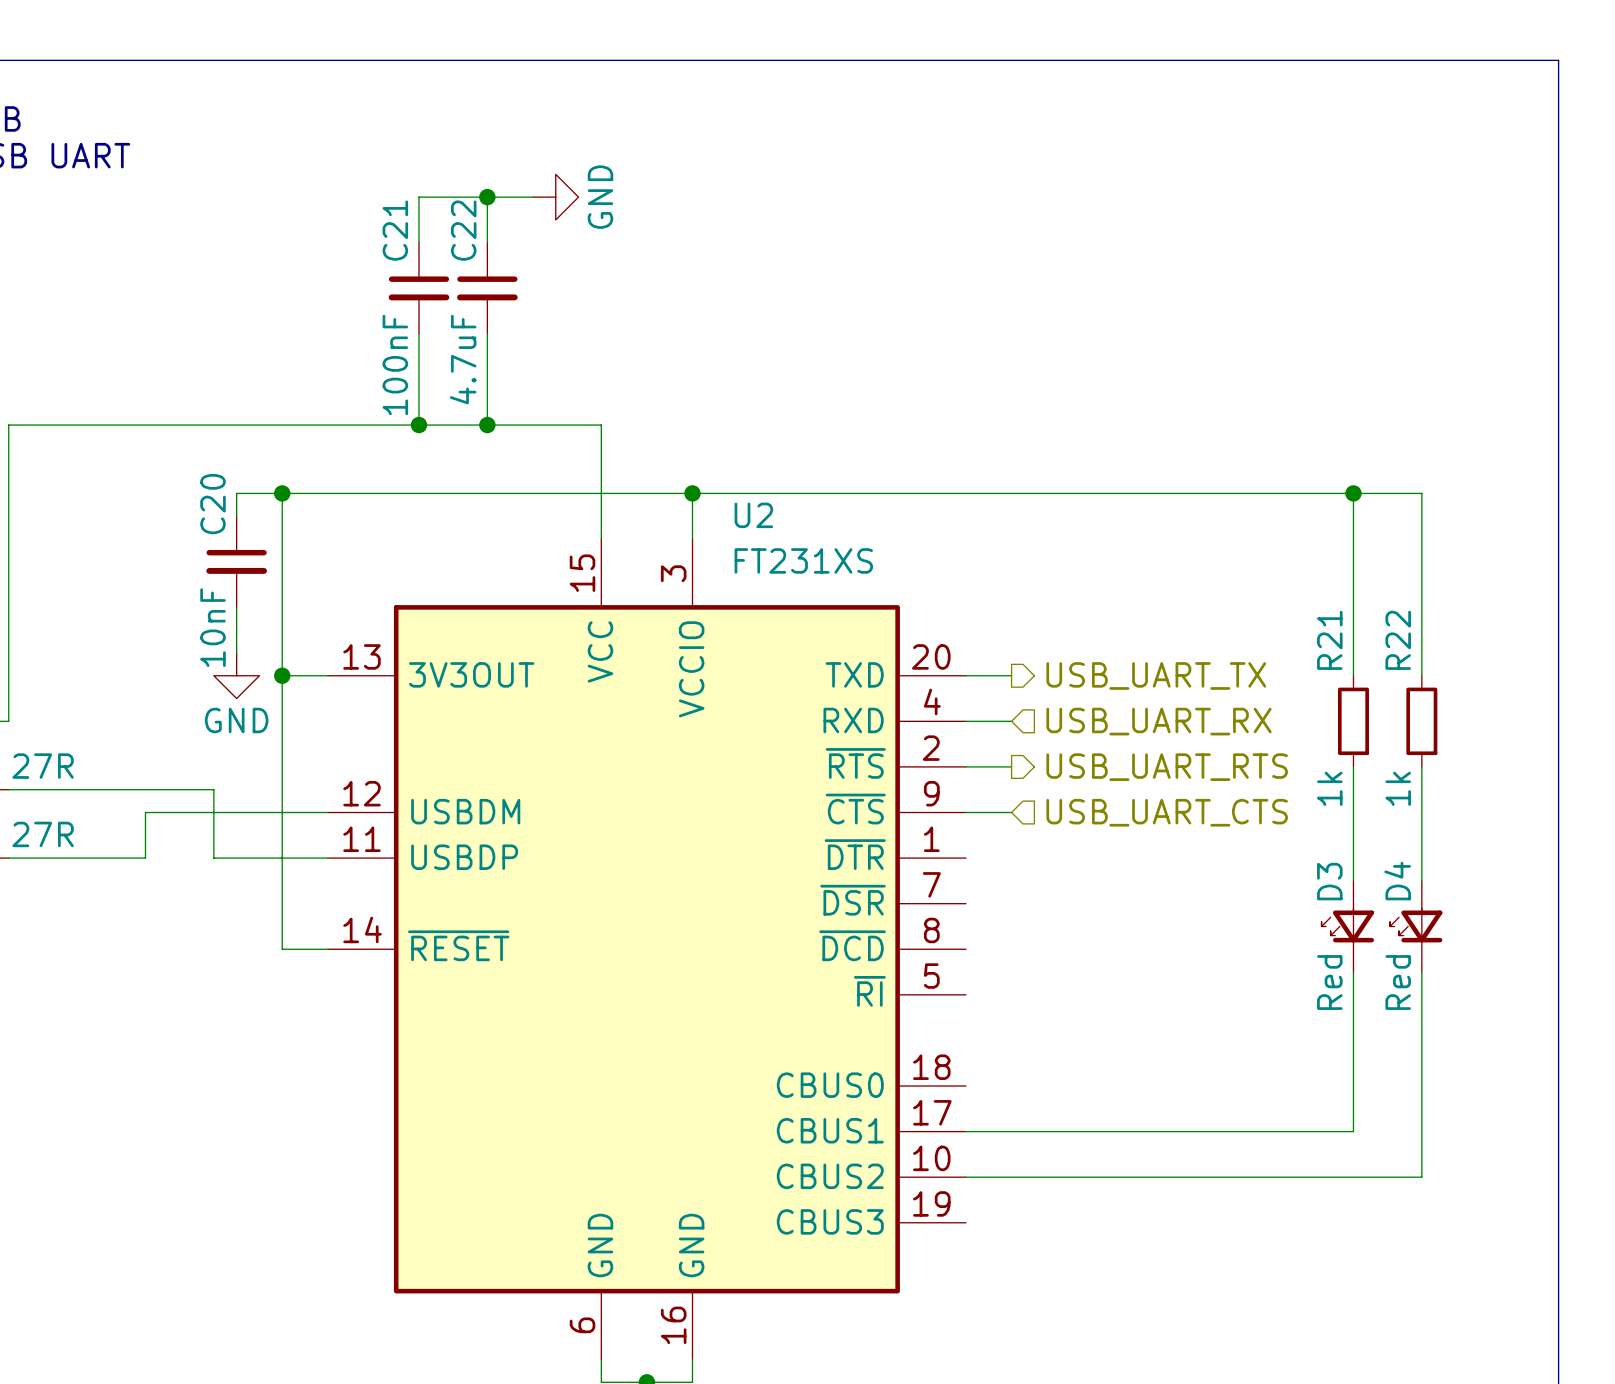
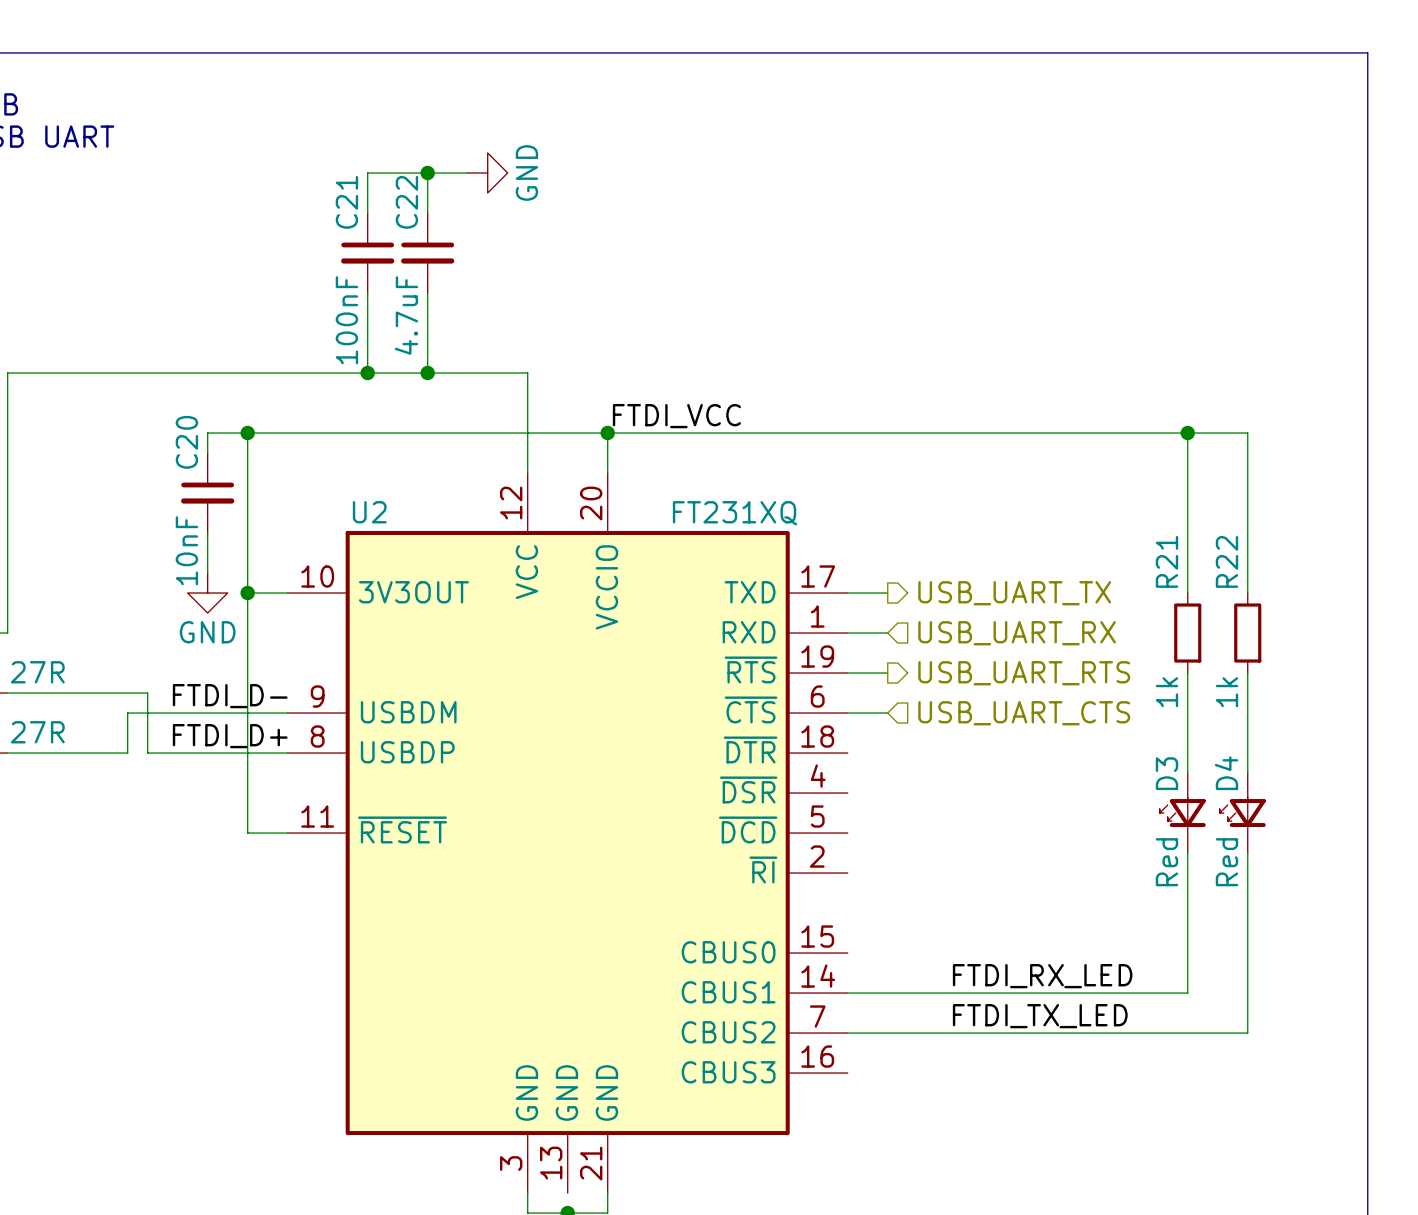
label: none -> FTDI_VCC (676, 416)
U2 name position: U2 (753, 515) -> U2 (369, 512)
U2 symbol: [327, 539, 967, 1360] -> [287, 473, 848, 1194]
U2 value: FT231XS (803, 560) -> FT231XQ (735, 513)
wire: (168, 789) (213, 789) (213, 858) -> (147, 693) (147, 753) (187, 753)
label: none -> FTDI_D- (230, 696)
label: none -> FTDI_D+ (230, 736)
label: none -> FTDI_RX_LED (1042, 976)
label: none -> FTDI_TX_LED (1040, 1016)

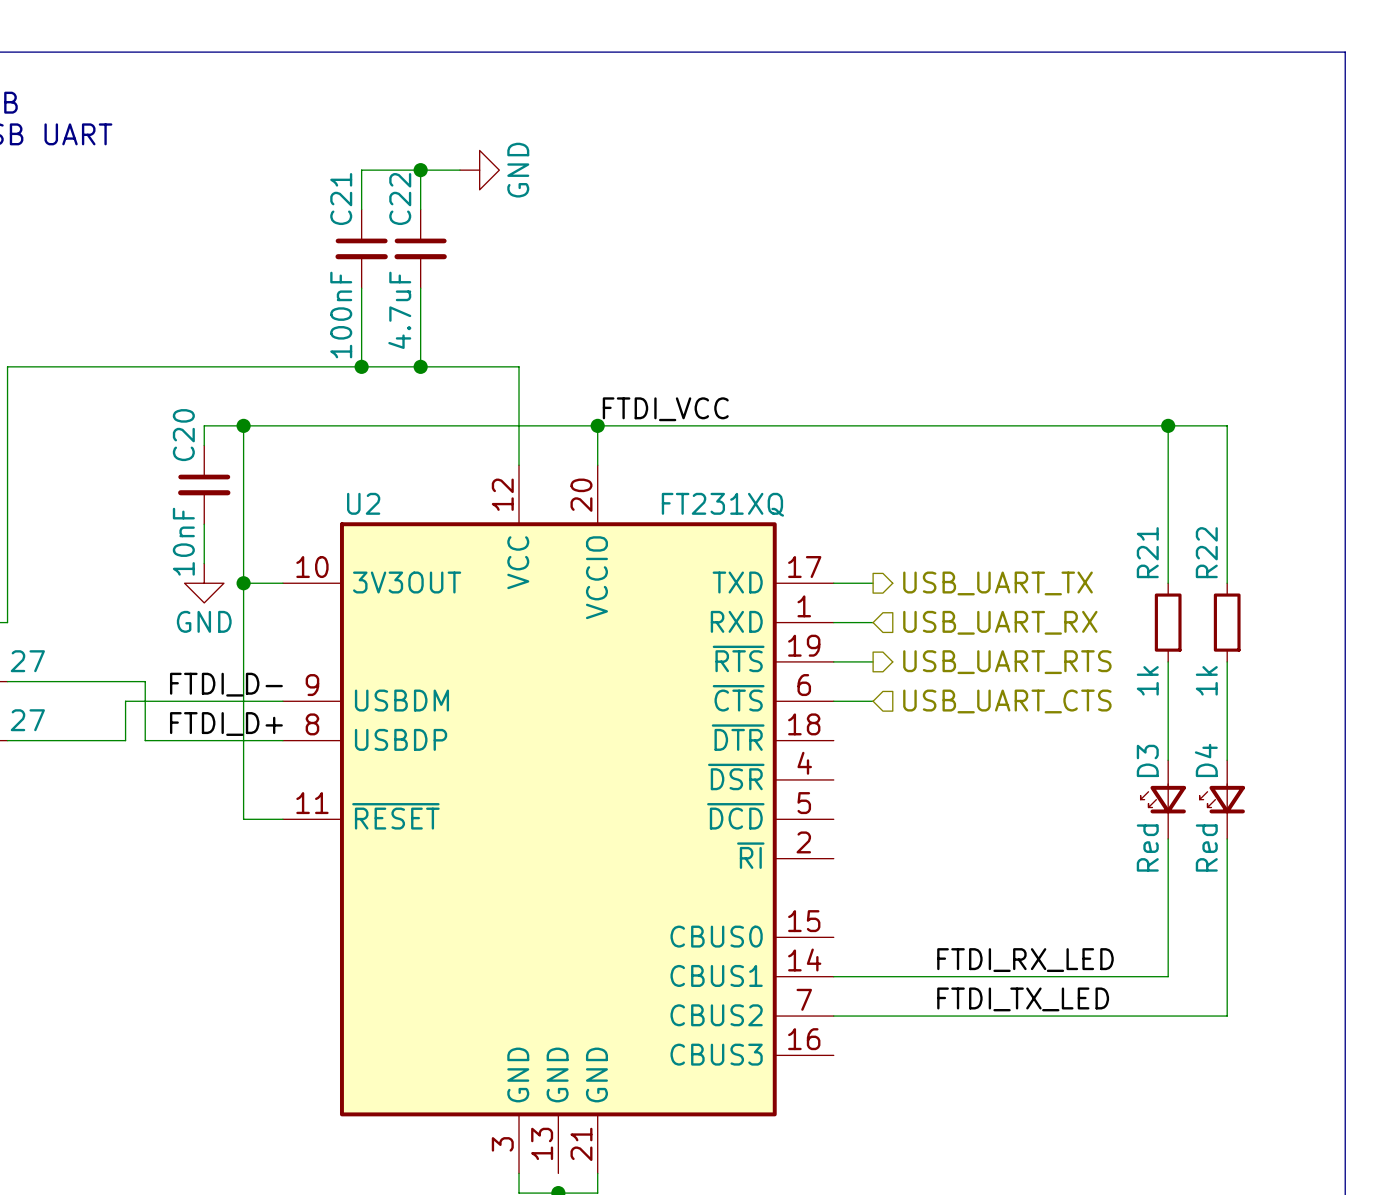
part value: 27R (37, 672) -> 27 (27, 661)
part value: 27R (37, 732) -> 27 (27, 720)

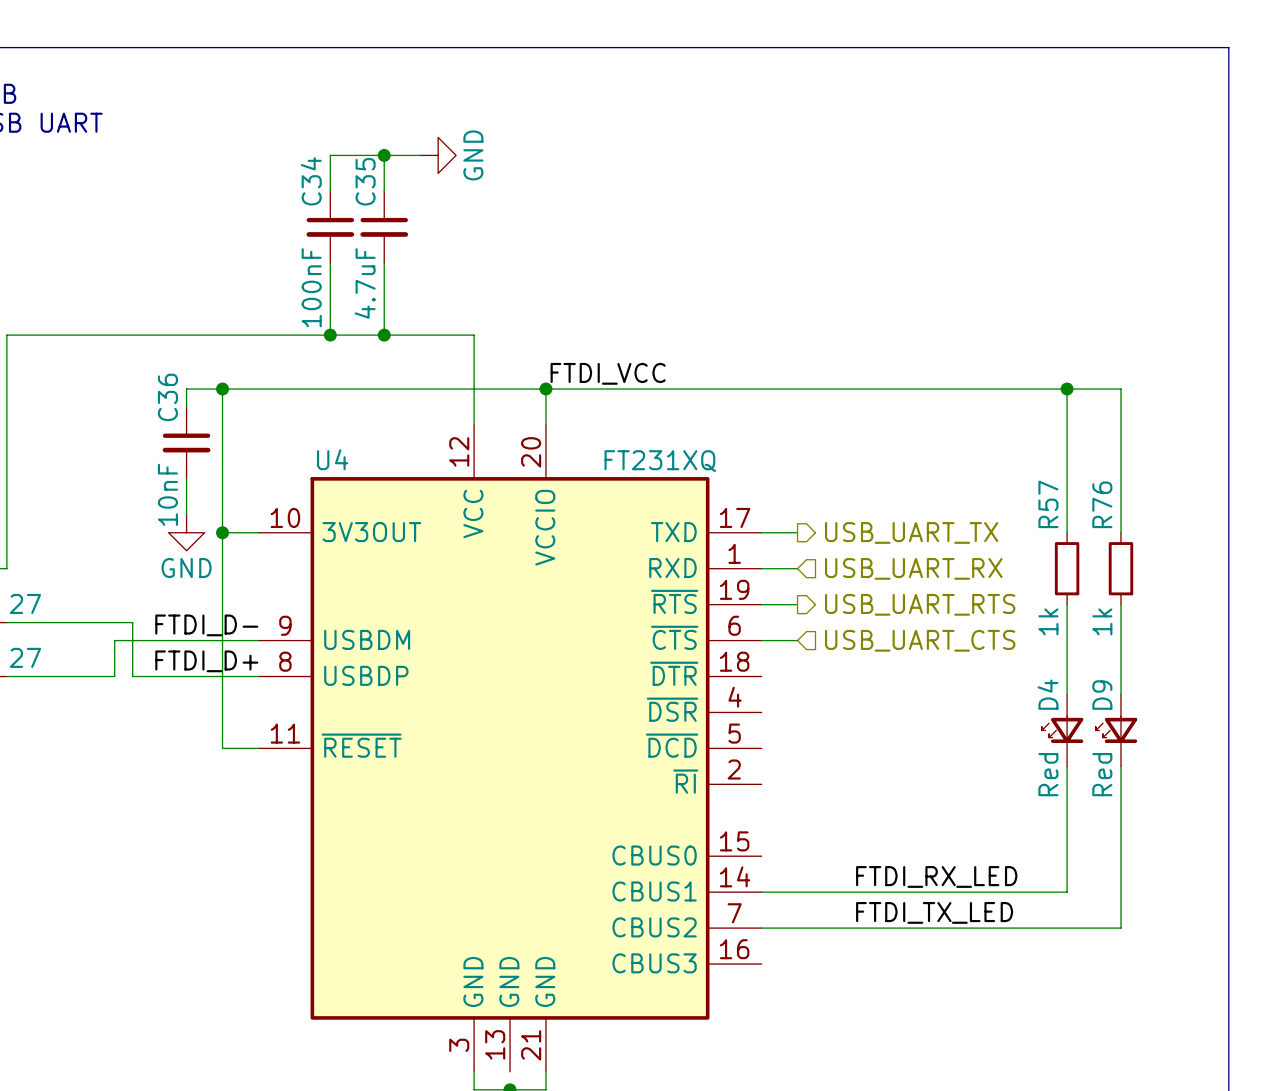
C21 name: C21 (341, 199) -> C34 (311, 181)
C22 name: C22 (400, 199) -> C35 (365, 181)
C20 name: C20 (183, 435) -> C36 (167, 397)
U2 name: U2 (363, 503) -> U4 (332, 459)
R21 name: R21 (1147, 552) -> R57 (1048, 504)
R22 name: R22 (1206, 552) -> R76 (1102, 504)
D3 name: D3 (1147, 760) -> D4 (1048, 694)
D4 name: D4 (1206, 760) -> D9 (1102, 695)

